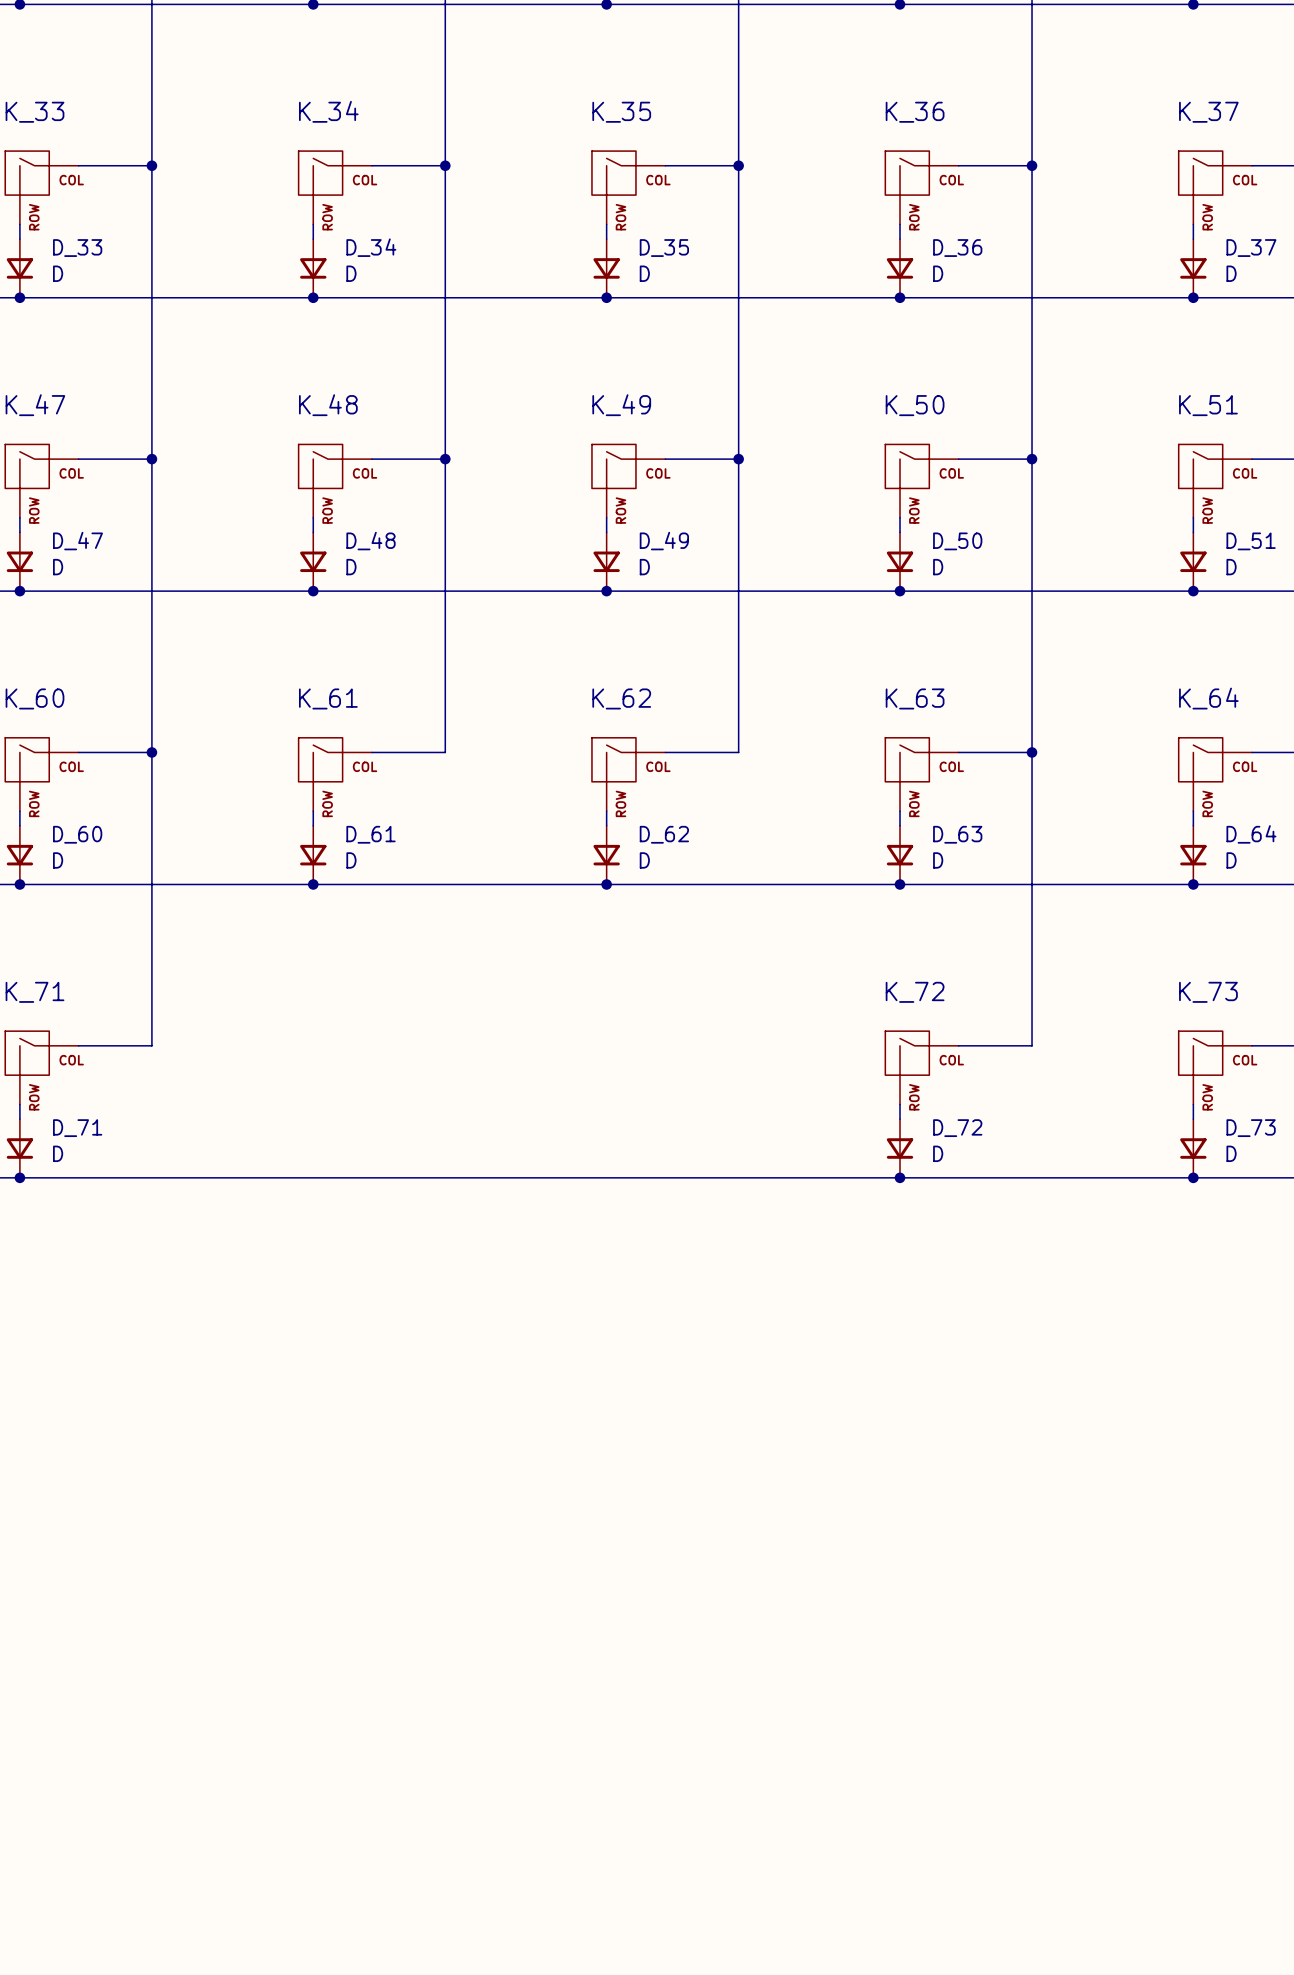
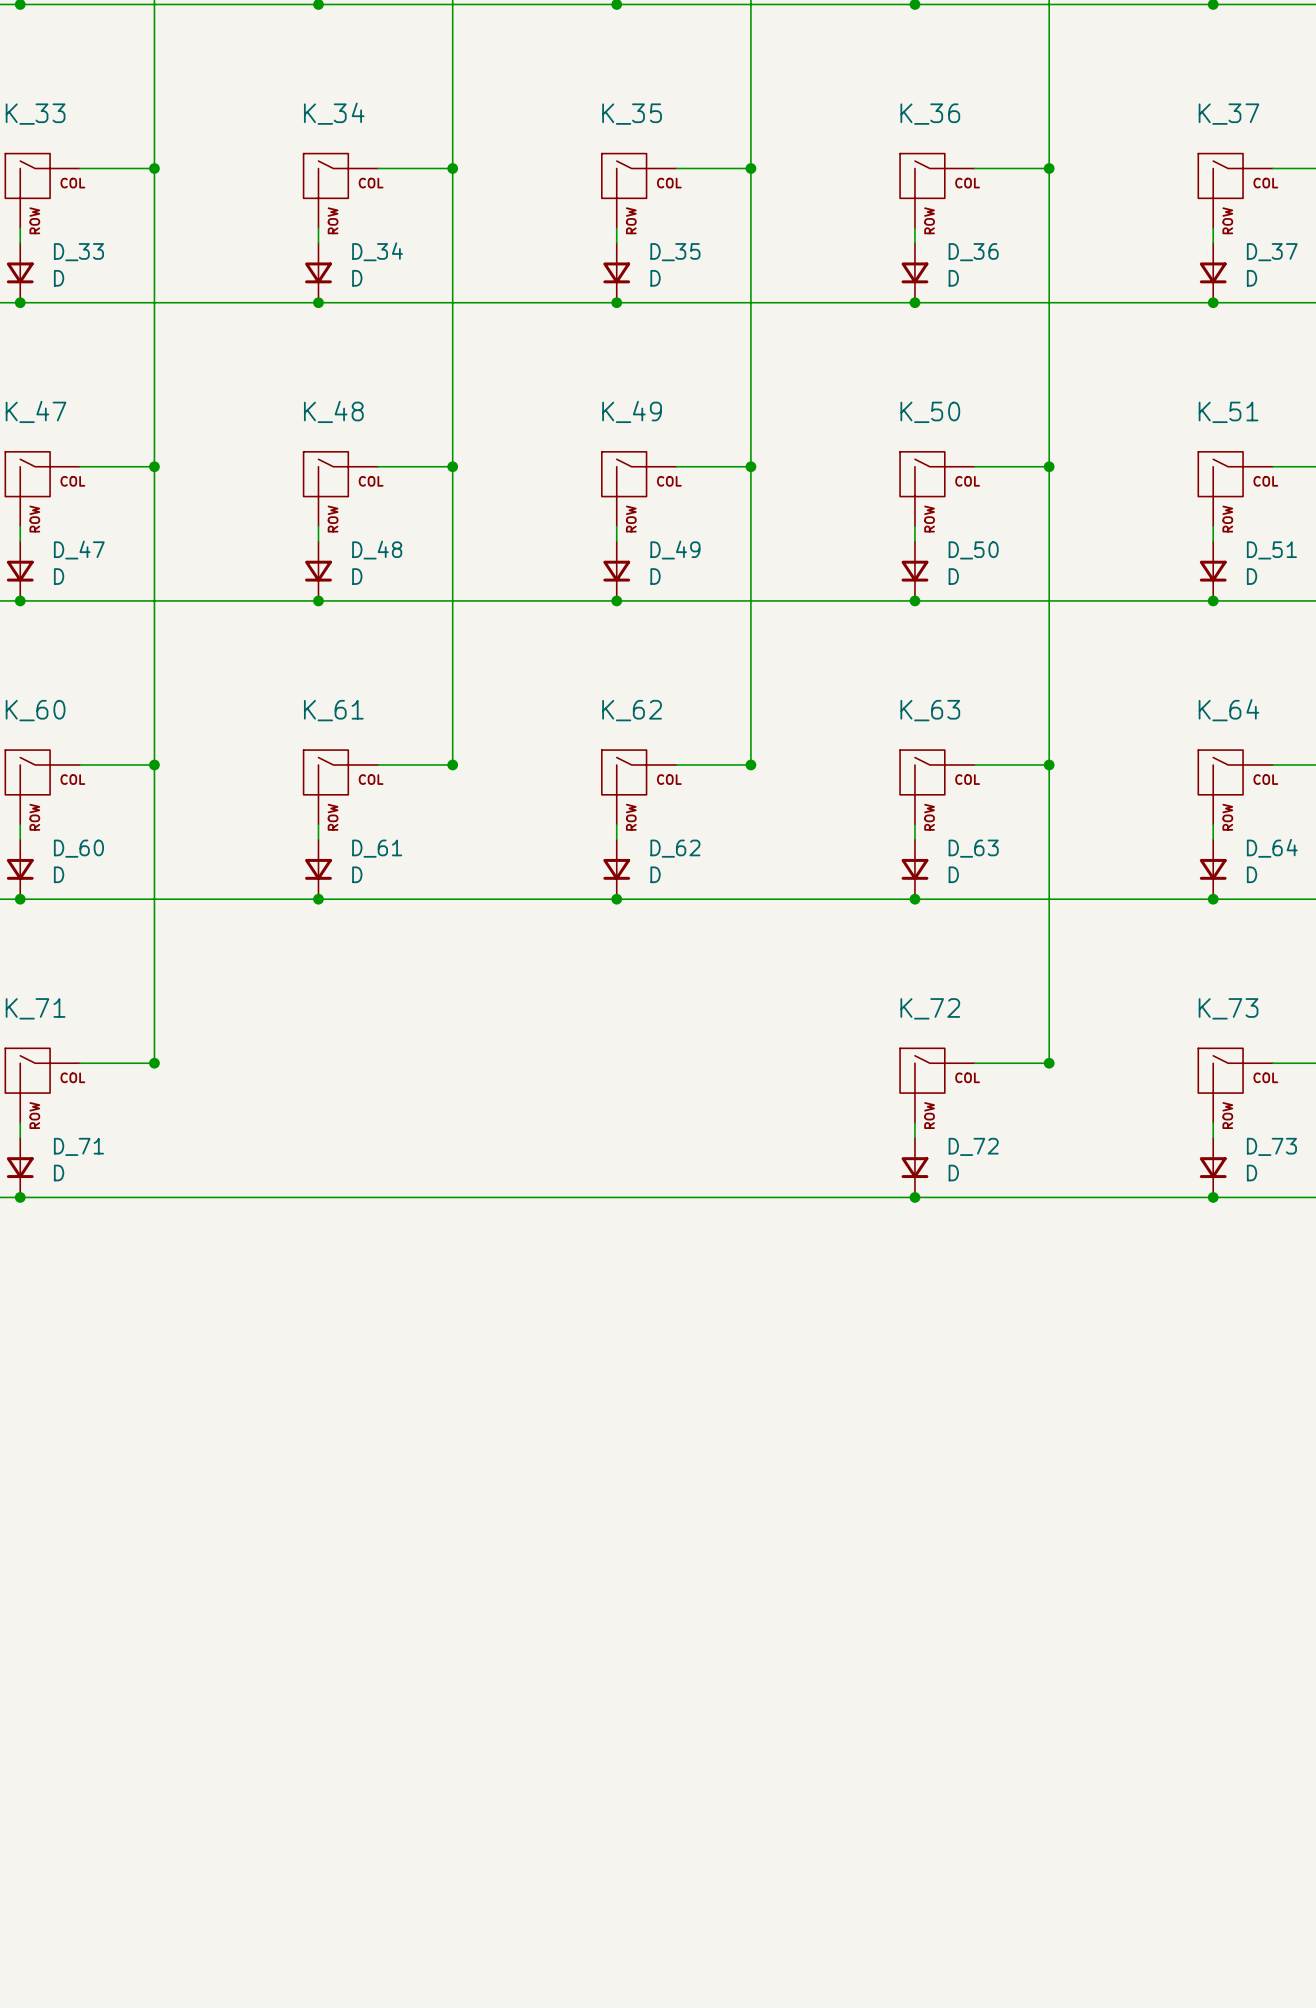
junction: none -> (452, 764)
junction: none -> (750, 764)
junction: none -> (154, 1063)
junction: none -> (1049, 1063)

